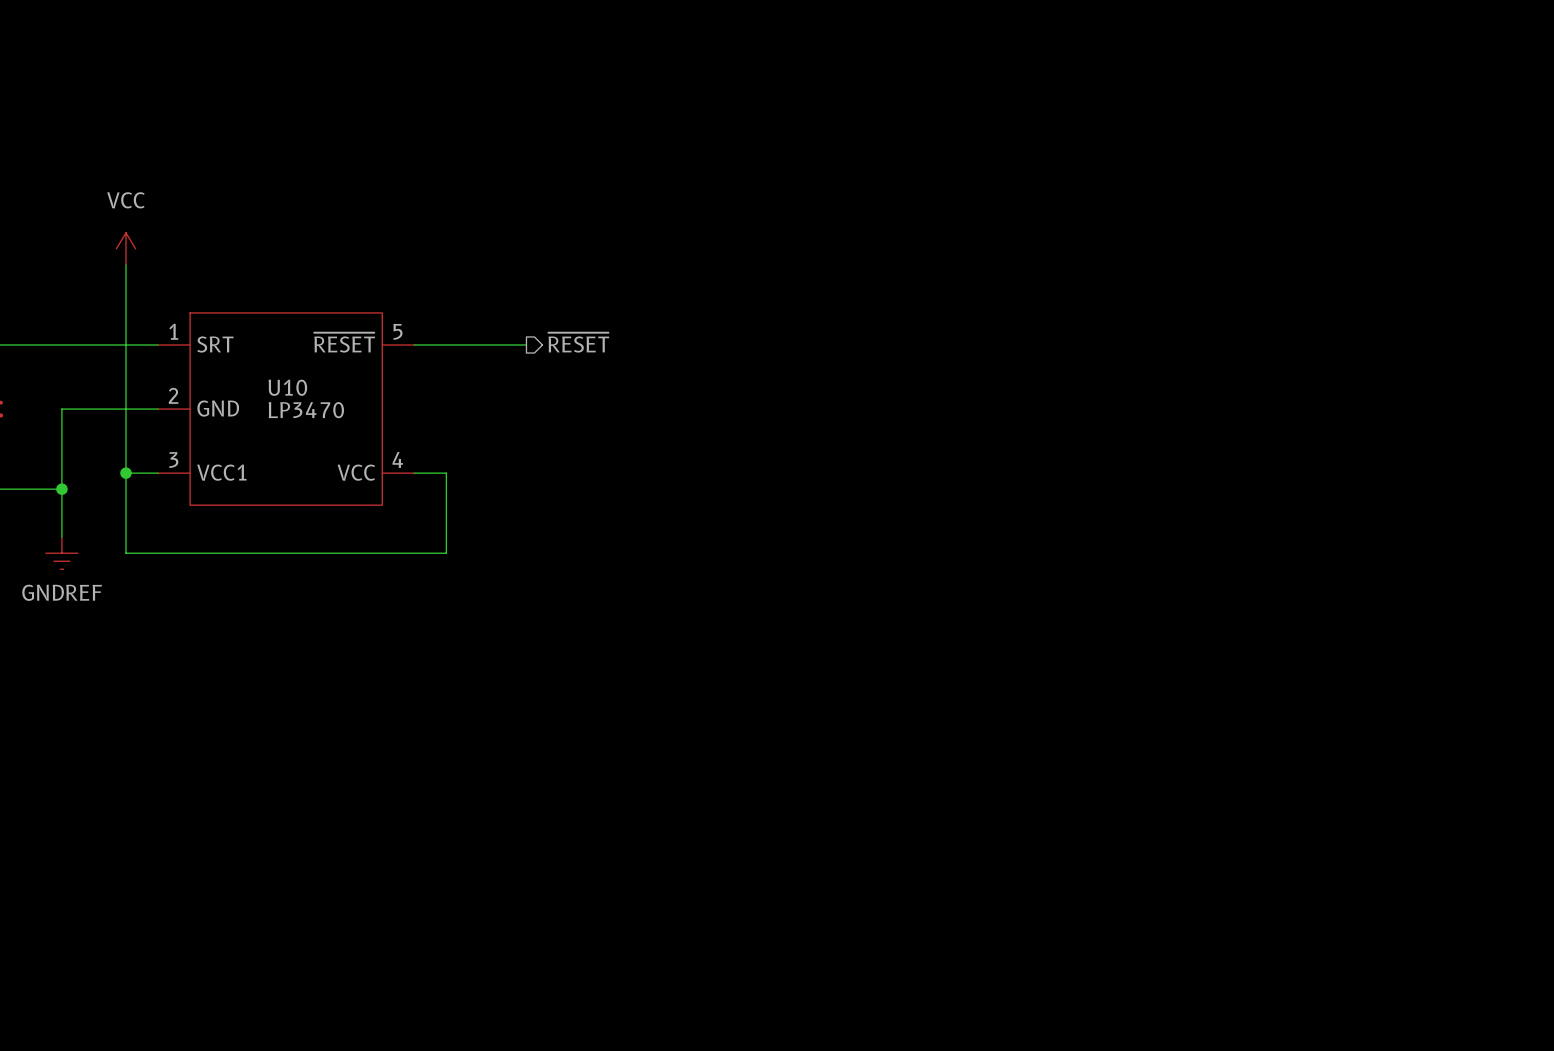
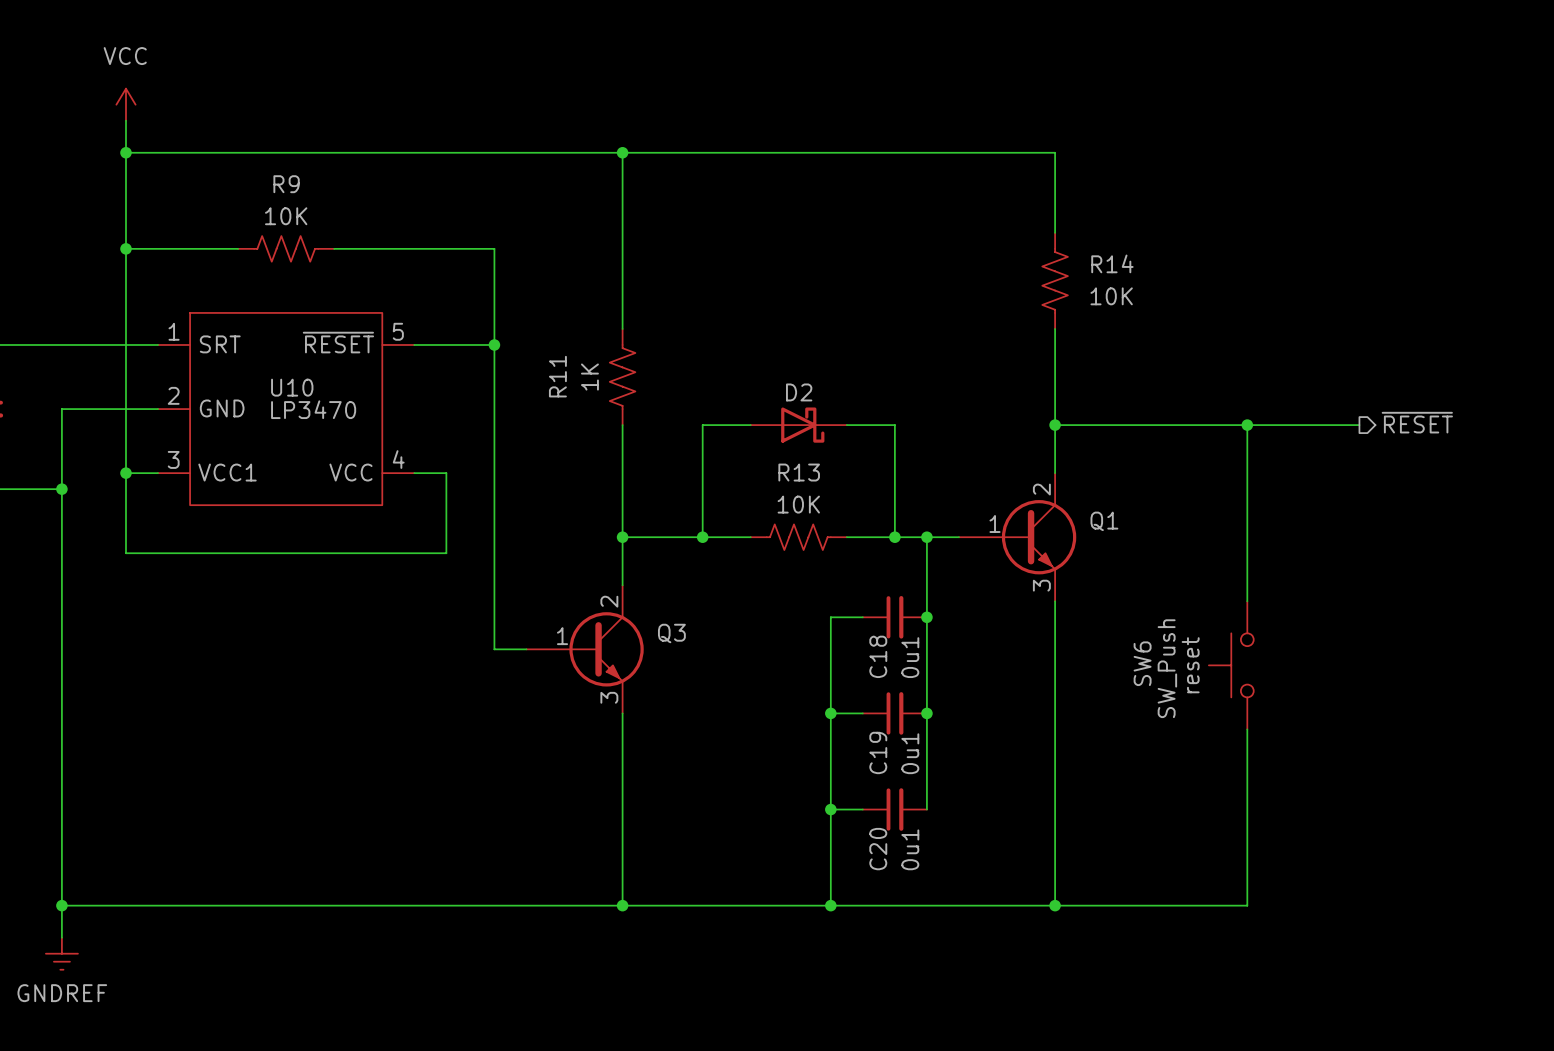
wire: none -> (126, 120) (126, 264)
wire: none -> (126, 152) (1055, 152) (1055, 232)
junction: none -> (126, 152)
wire: none -> (622, 152) (622, 328)
junction: none -> (622, 152)
wire: none -> (126, 248) (238, 248)
power symbol position: VCC (126, 248) -> VCC (126, 104)
junction: none -> (126, 248)
R9: none -> 10K (286, 248)
wire: none -> (334, 248) (494, 248) (494, 649) (526, 649)
R14: none -> 10K (1055, 280)
wire: none -> (1055, 328) (1055, 473)
hierarchical label: ~{RESET} (578, 342) -> none
wire: (494, 344) (526, 344) -> none
junction: none -> (494, 344)
R11: none -> 1K (622, 377)
hierarchical label: none -> ~{RESET} (1417, 422)
wire: none -> (622, 425) (622, 585)
wire: none -> (750, 425) (702, 425) (702, 537)
D2: none -> (798, 425)
wire: none -> (846, 425) (894, 425) (894, 537)
wire: none -> (1055, 425) (1359, 425)
junction: none -> (1055, 425)
wire: none -> (1247, 425) (1247, 601)
junction: none -> (1247, 425)
wire: none -> (61, 537) (61, 937)
wire: none -> (622, 537) (750, 537)
junction: none -> (622, 537)
junction: none -> (702, 537)
R13: none -> 10K (798, 537)
wire: none -> (846, 537) (958, 537)
junction: none -> (894, 537)
wire: none -> (926, 537) (926, 809)
junction: none -> (926, 537)
Q1: none -> (1017, 537)
power symbol: GNDREF (61, 553) -> none
wire: none -> (1055, 601) (1055, 905)
wire: none -> (862, 617) (830, 617) (830, 905)
C18: none -> 0u1 (894, 617)
junction: none -> (926, 617)
Q3: none -> (585, 649)
SW6: none -> SW_Push (1231, 665)
wire: none -> (622, 713) (622, 905)
wire: none -> (830, 713) (862, 713)
junction: none -> (830, 713)
C19: none -> 0u1 (894, 713)
junction: none -> (926, 713)
wire: none -> (1247, 729) (1247, 905) (61, 905)
wire: none -> (830, 809) (862, 809)
junction: none -> (830, 809)
C20: none -> 0u1 (894, 809)
junction: none -> (61, 905)
junction: none -> (622, 905)
junction: none -> (830, 905)
junction: none -> (1055, 905)
power symbol: none -> GNDREF (61, 953)

